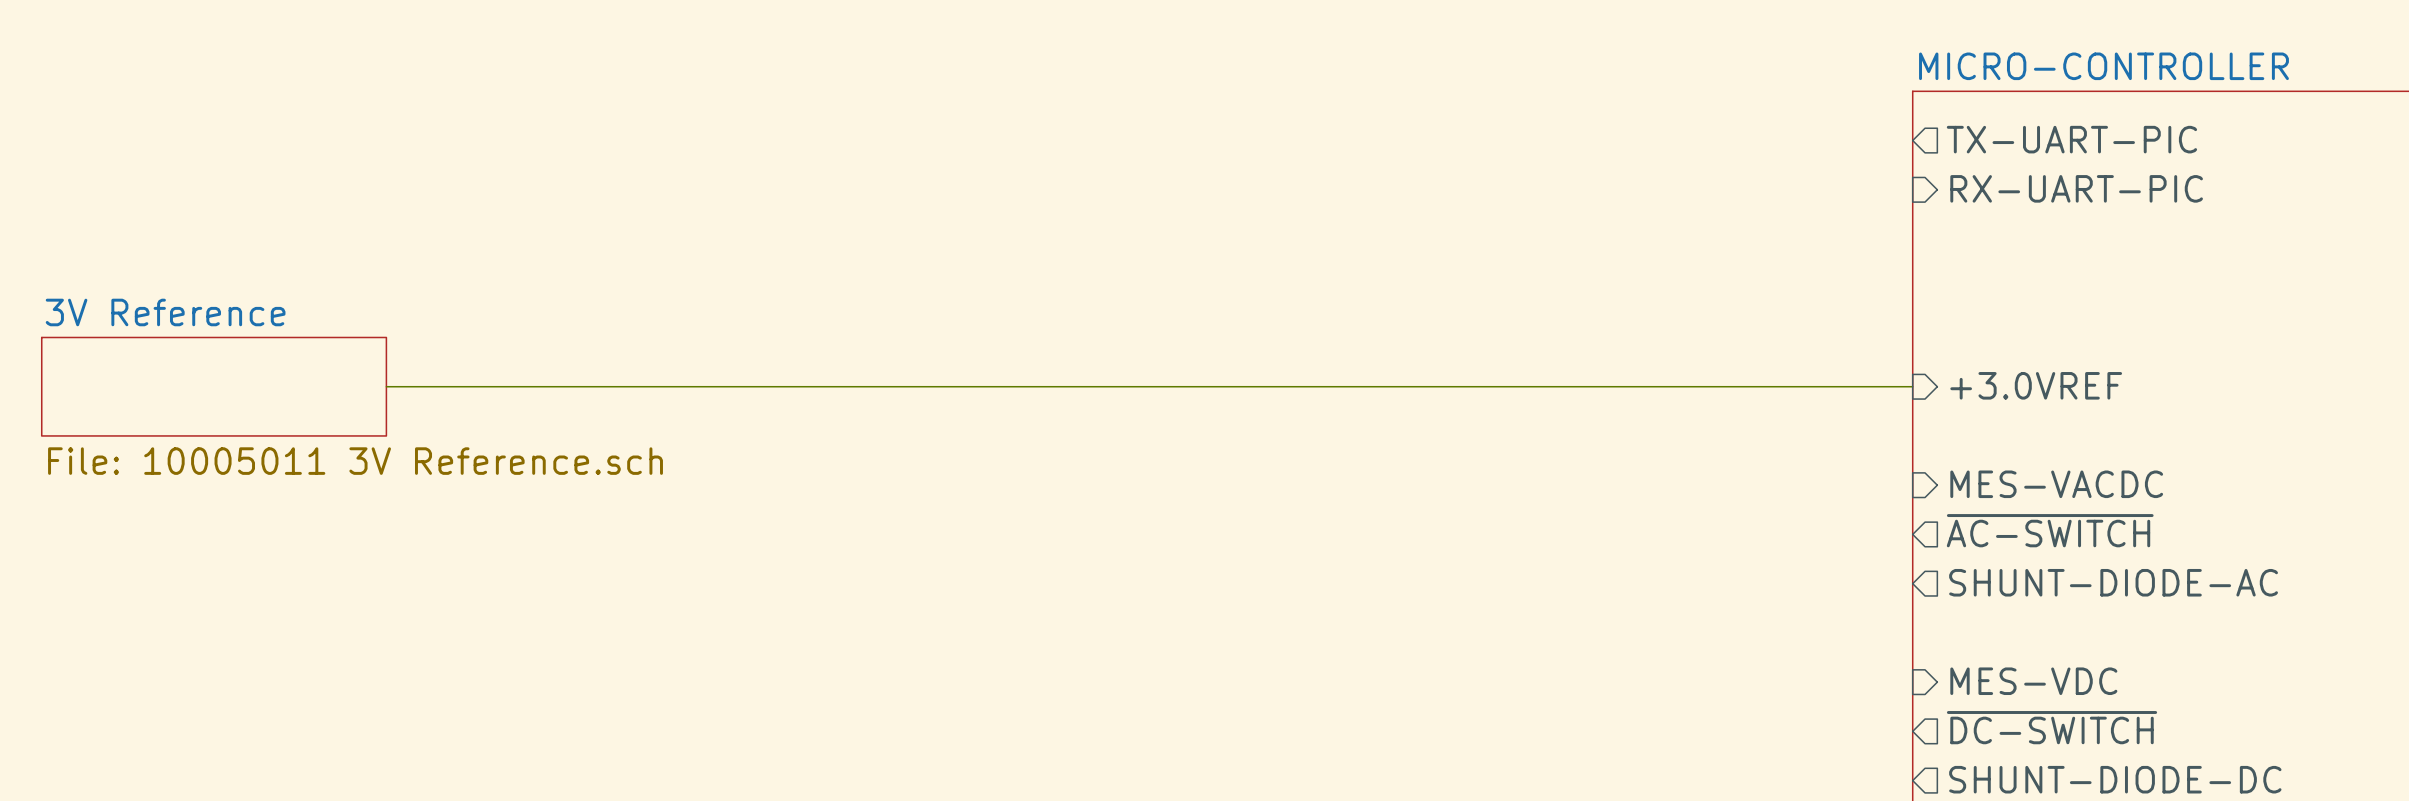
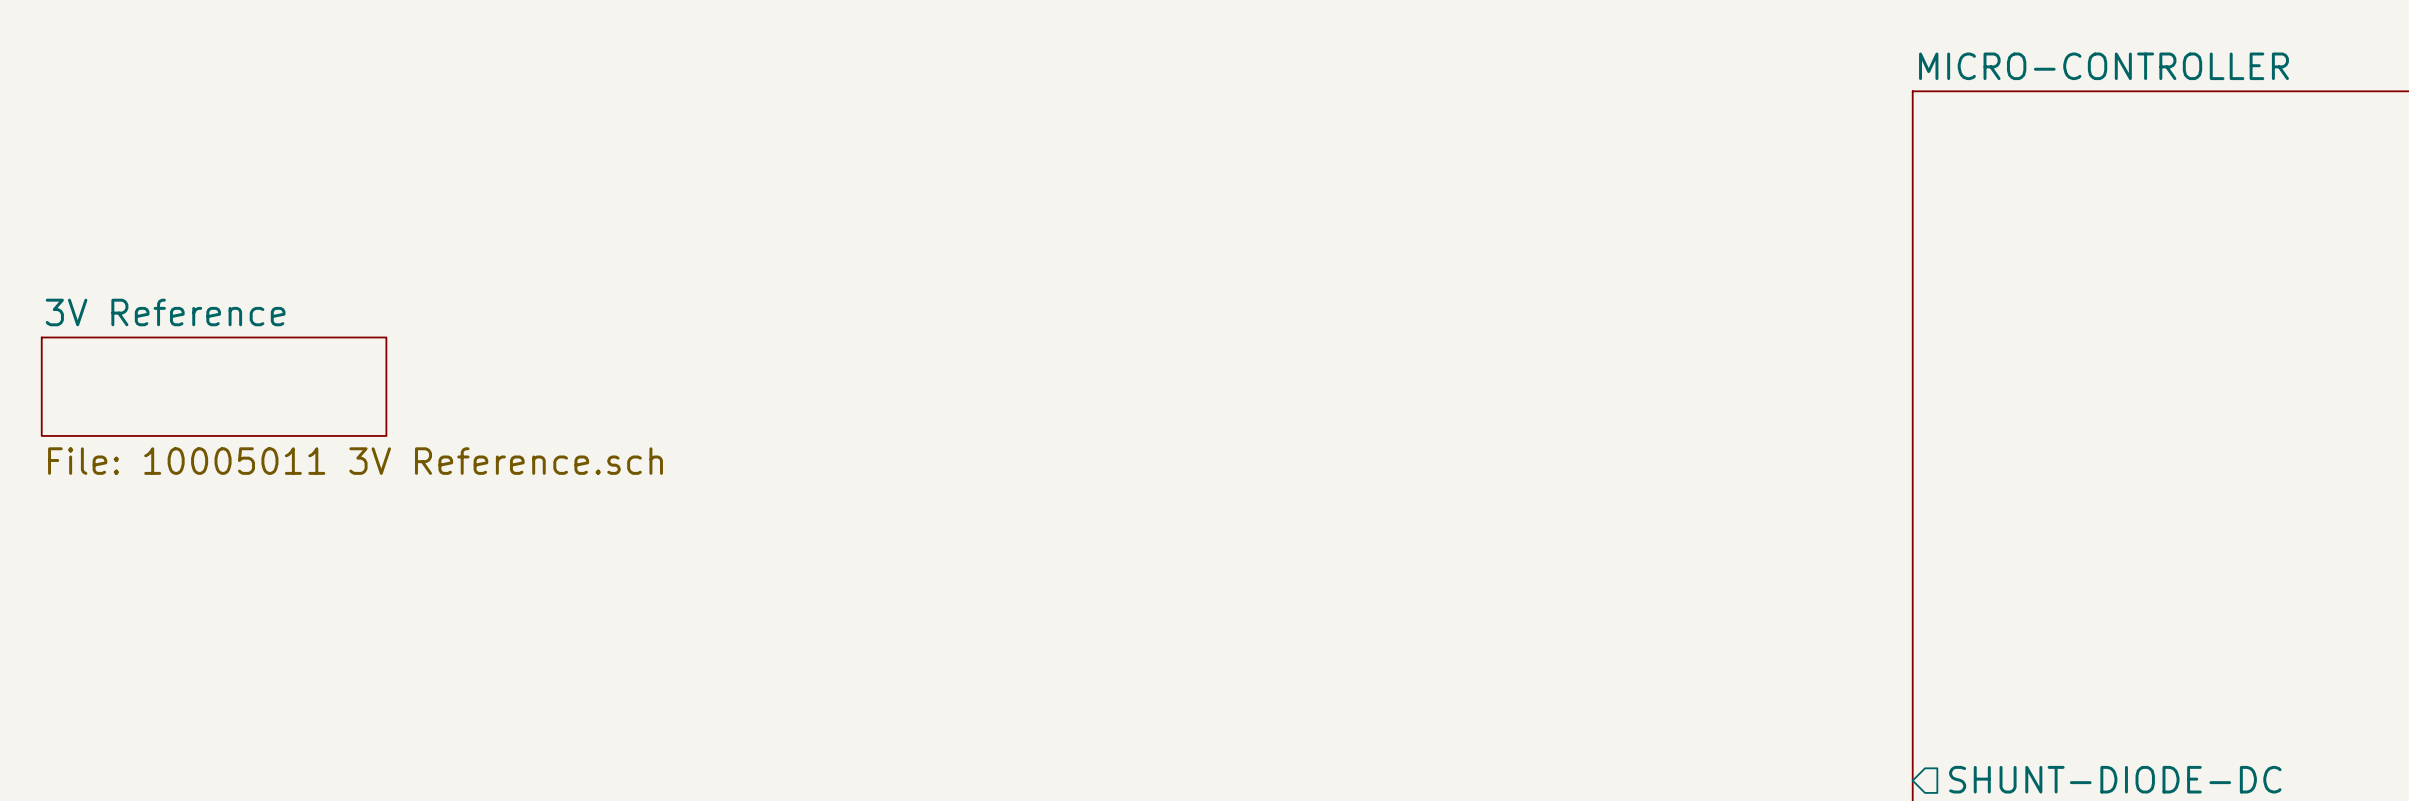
sheet pin: TX-UART-PIC (2071, 139) -> none
sheet pin: RX-UART-PIC (2076, 188) -> none
sheet pin: +3.0VREF (2036, 385) -> none
wire: (386, 386) (1912, 386) -> none
sheet pin: MES-VACDC (2056, 484) -> none
sheet pin: ~{AC-SWITCH} (2050, 530) -> none
sheet pin: SHUNT-DIODE-AC (2113, 582) -> none
sheet pin: MES-VDC (2033, 681) -> none
sheet pin: ~{DC-SWITCH} (2052, 727) -> none

